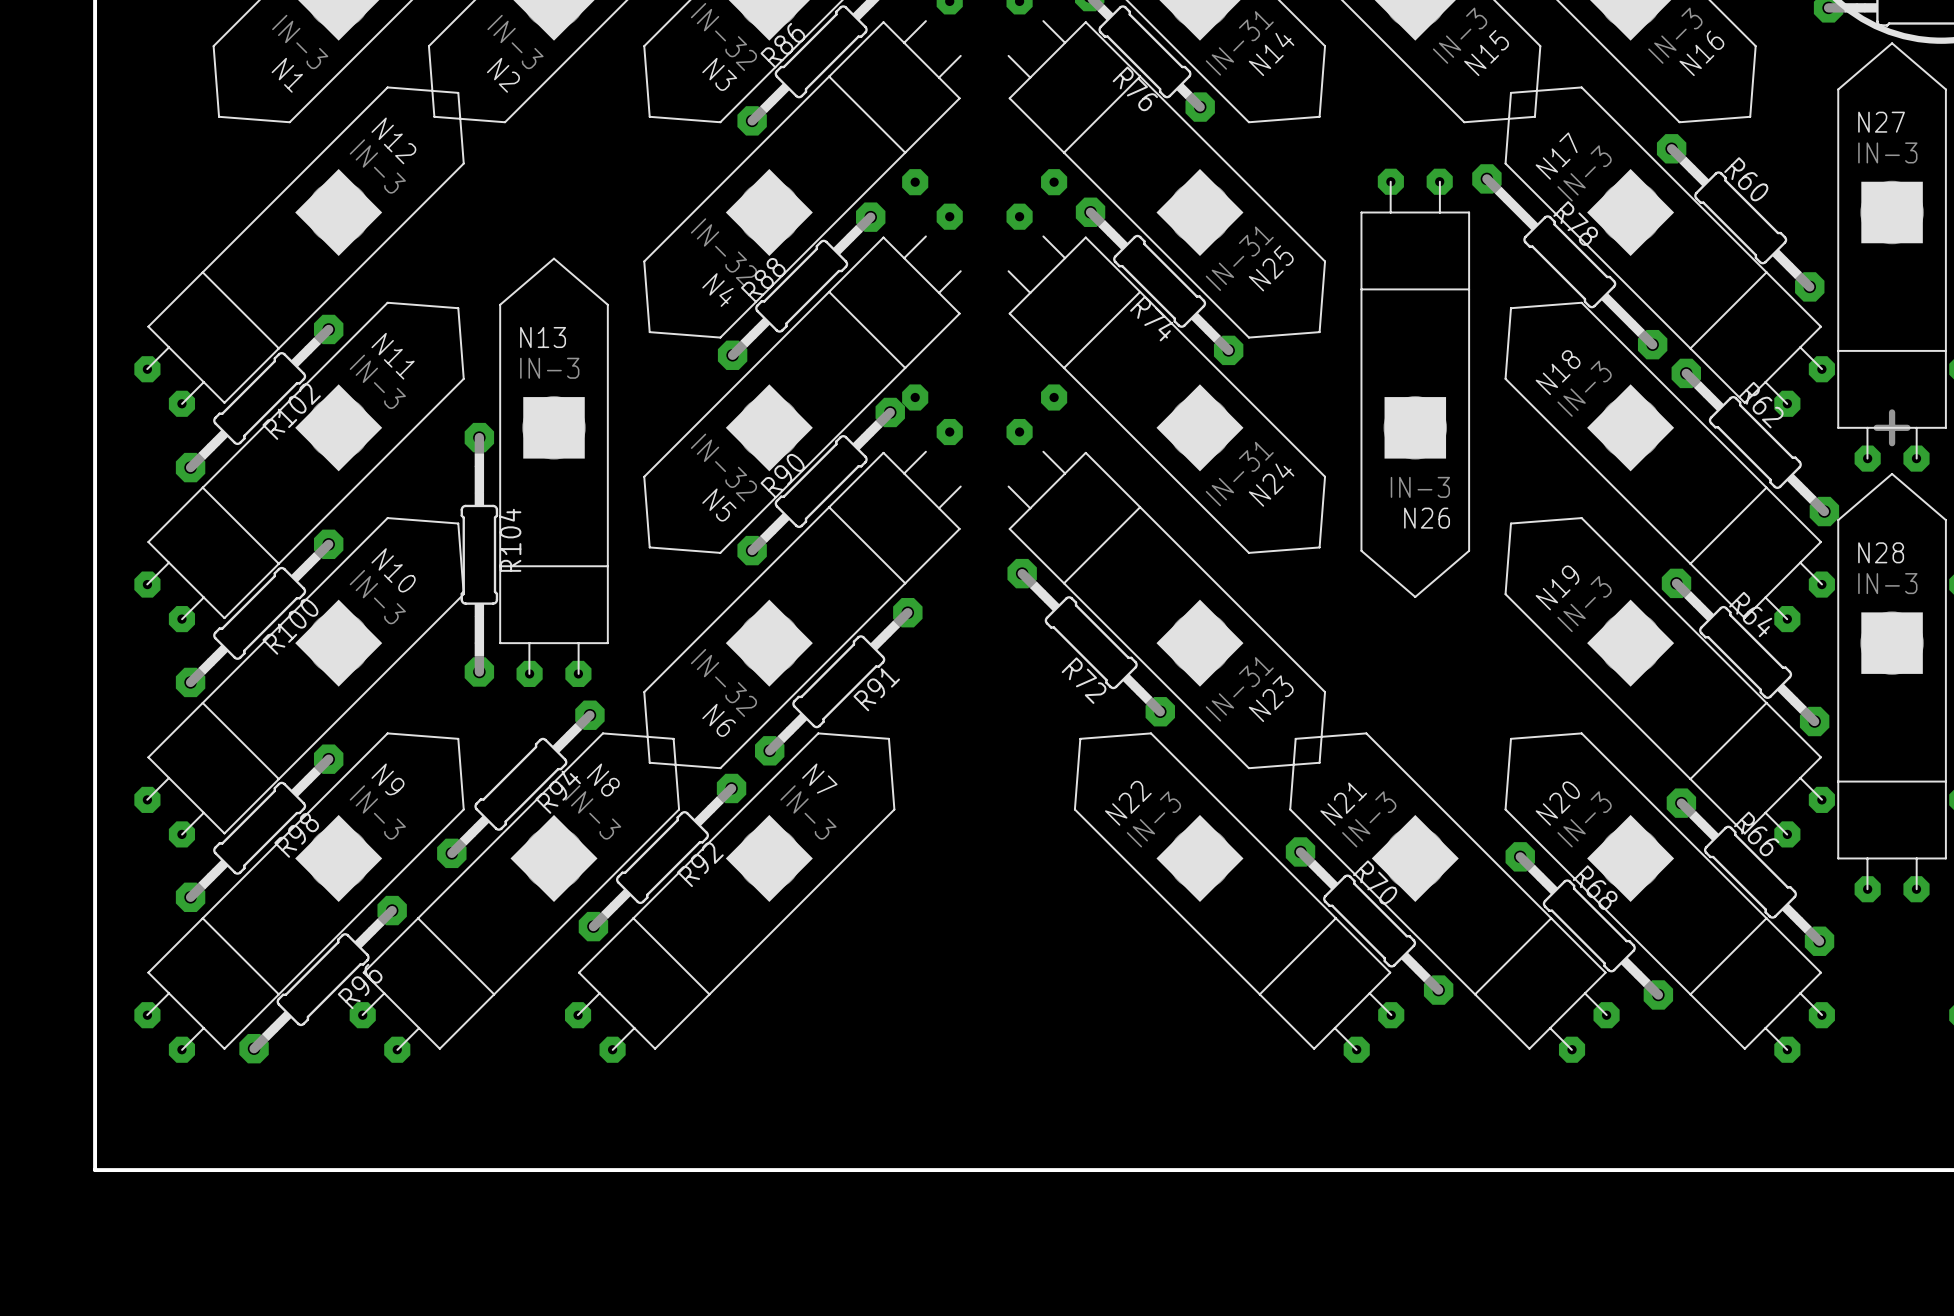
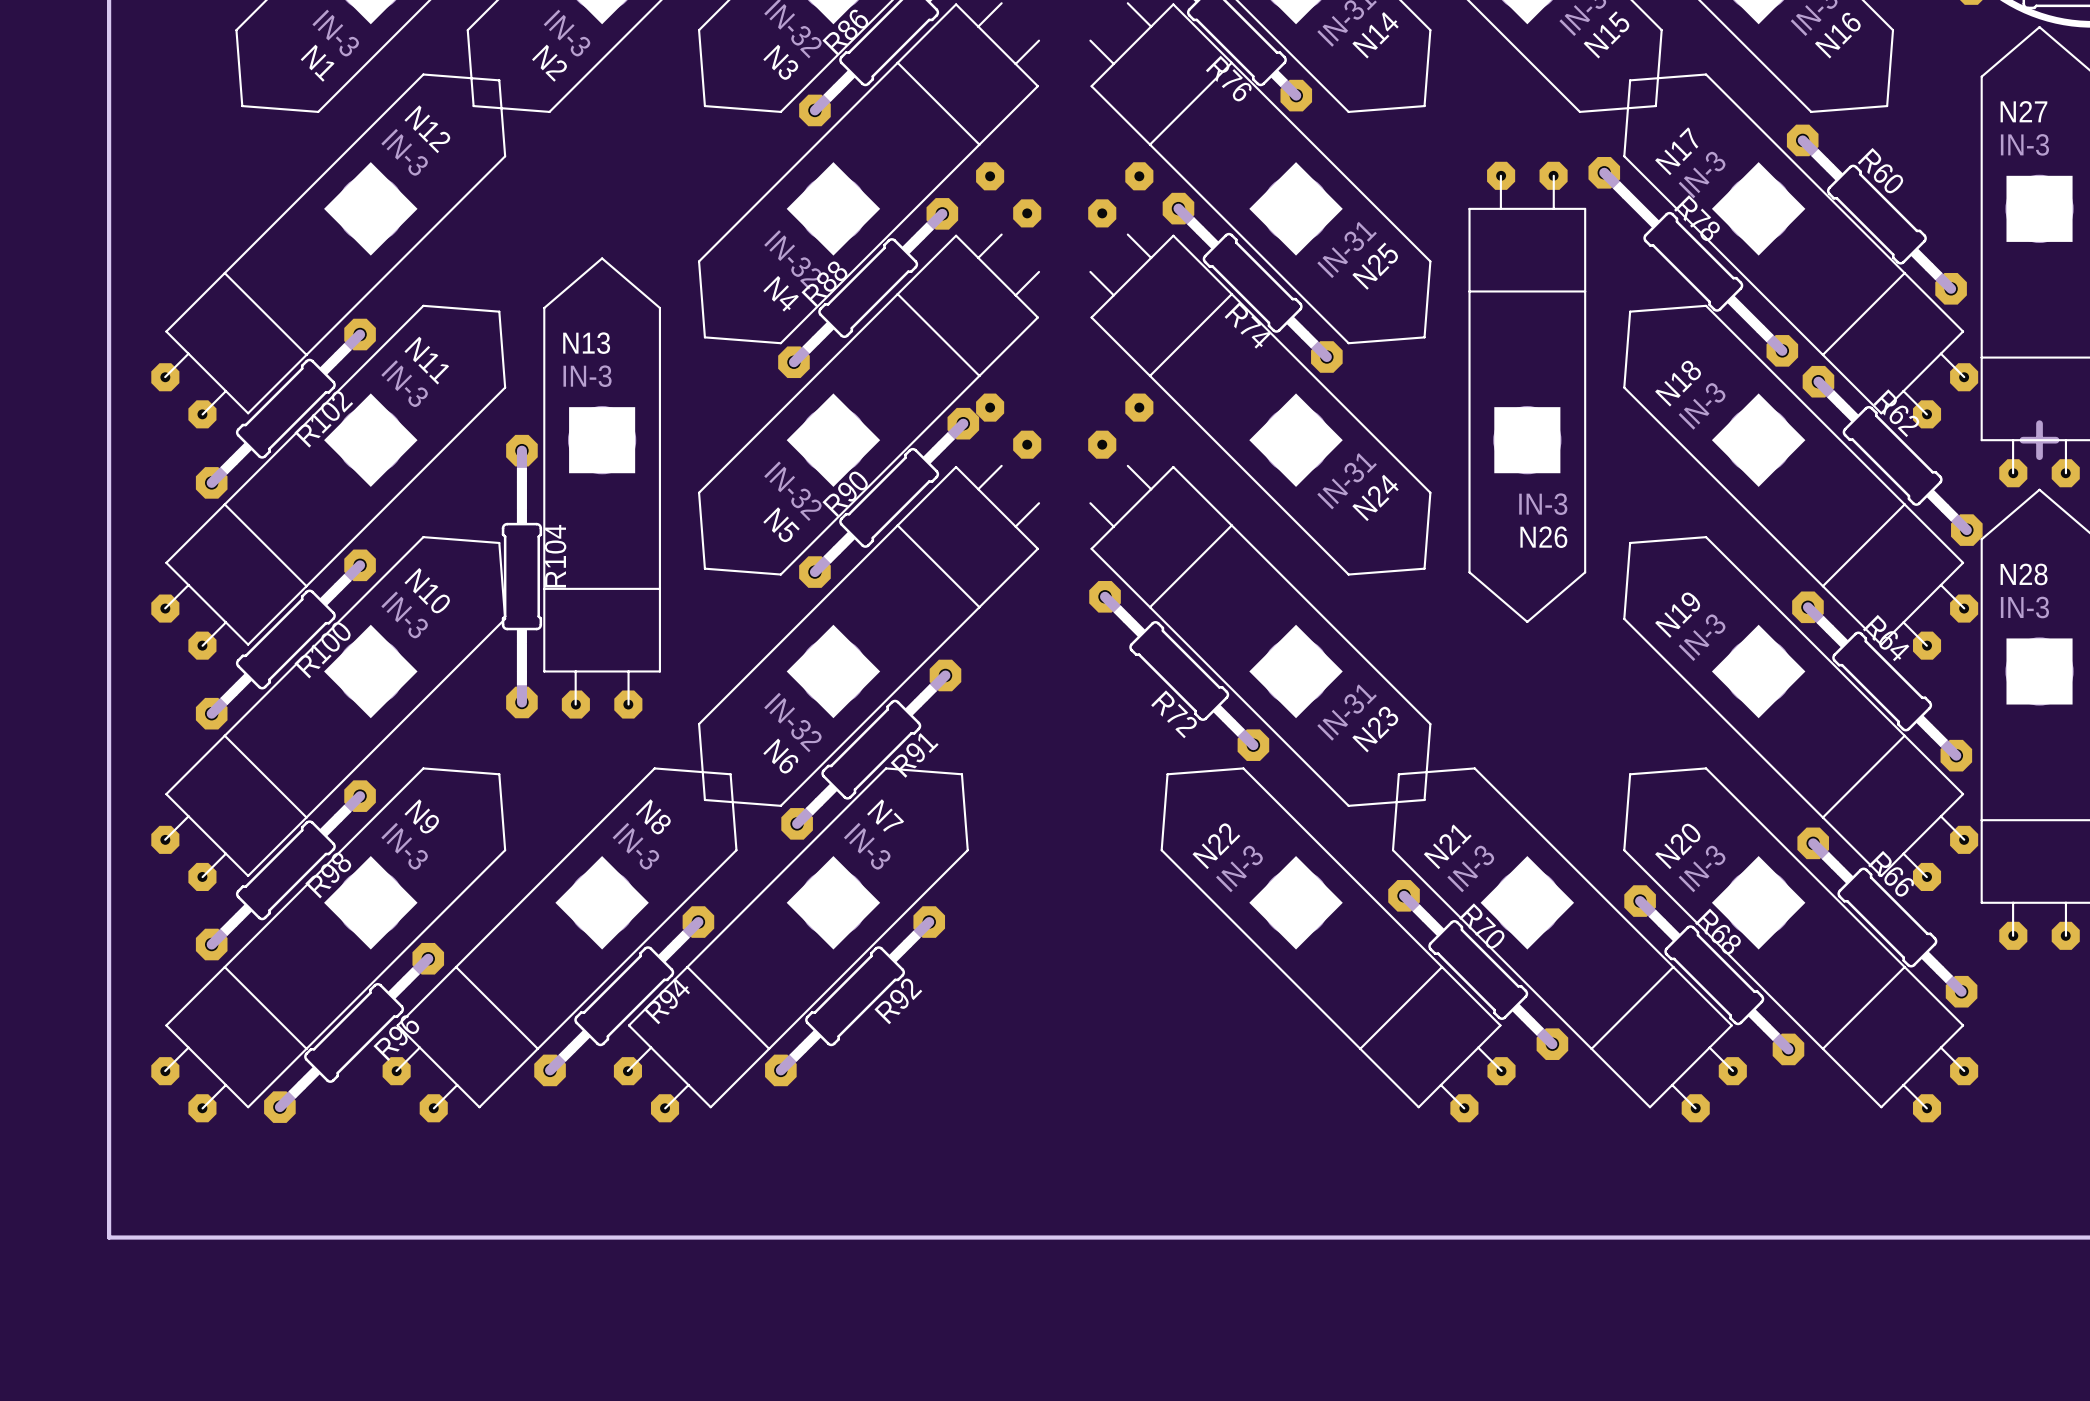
R91 position: (838, 681) -> (871, 749)
R94 position: (520, 784) -> (624, 996)
R92 position: (662, 857) -> (855, 996)

